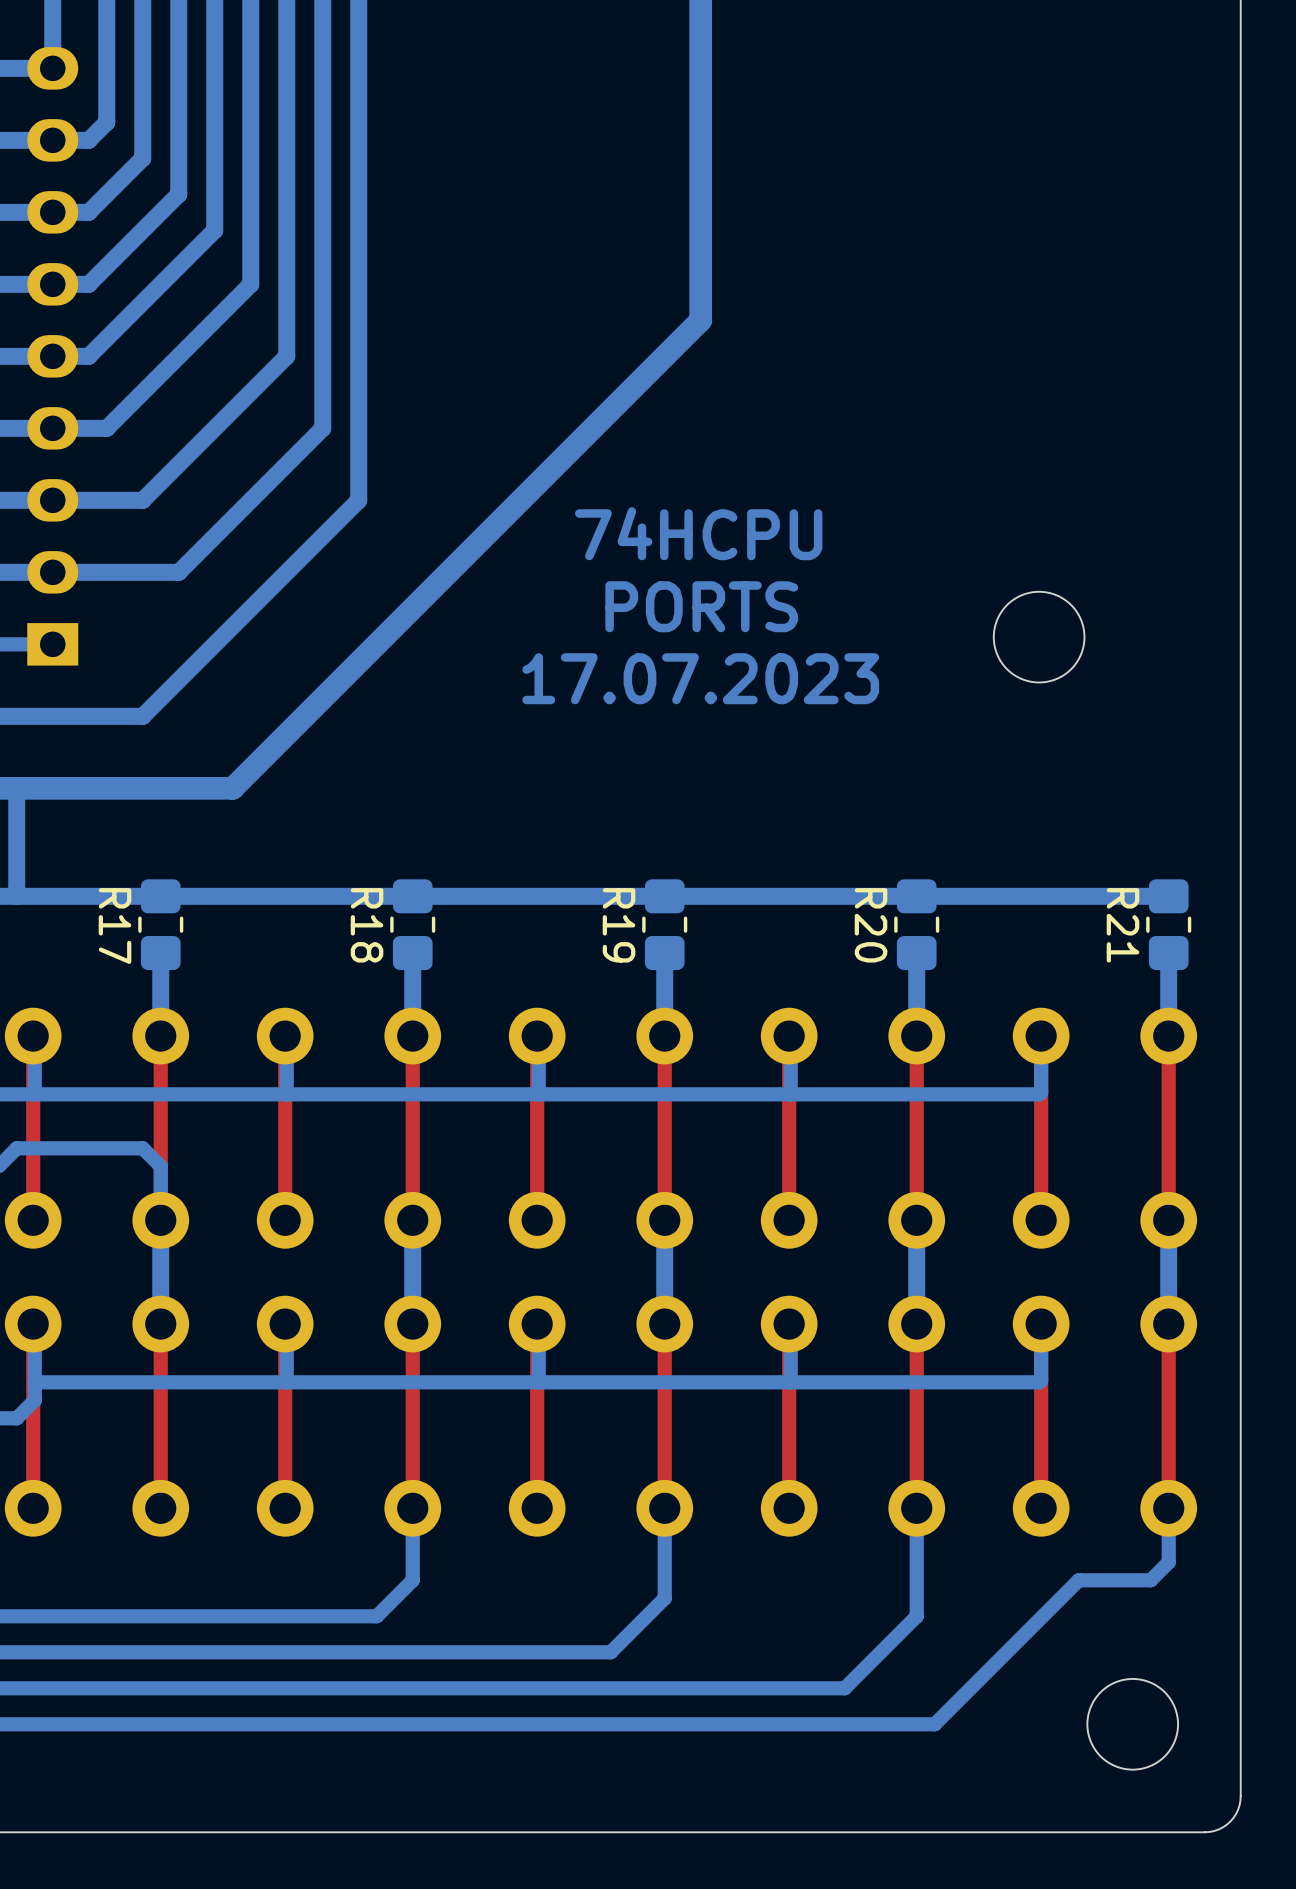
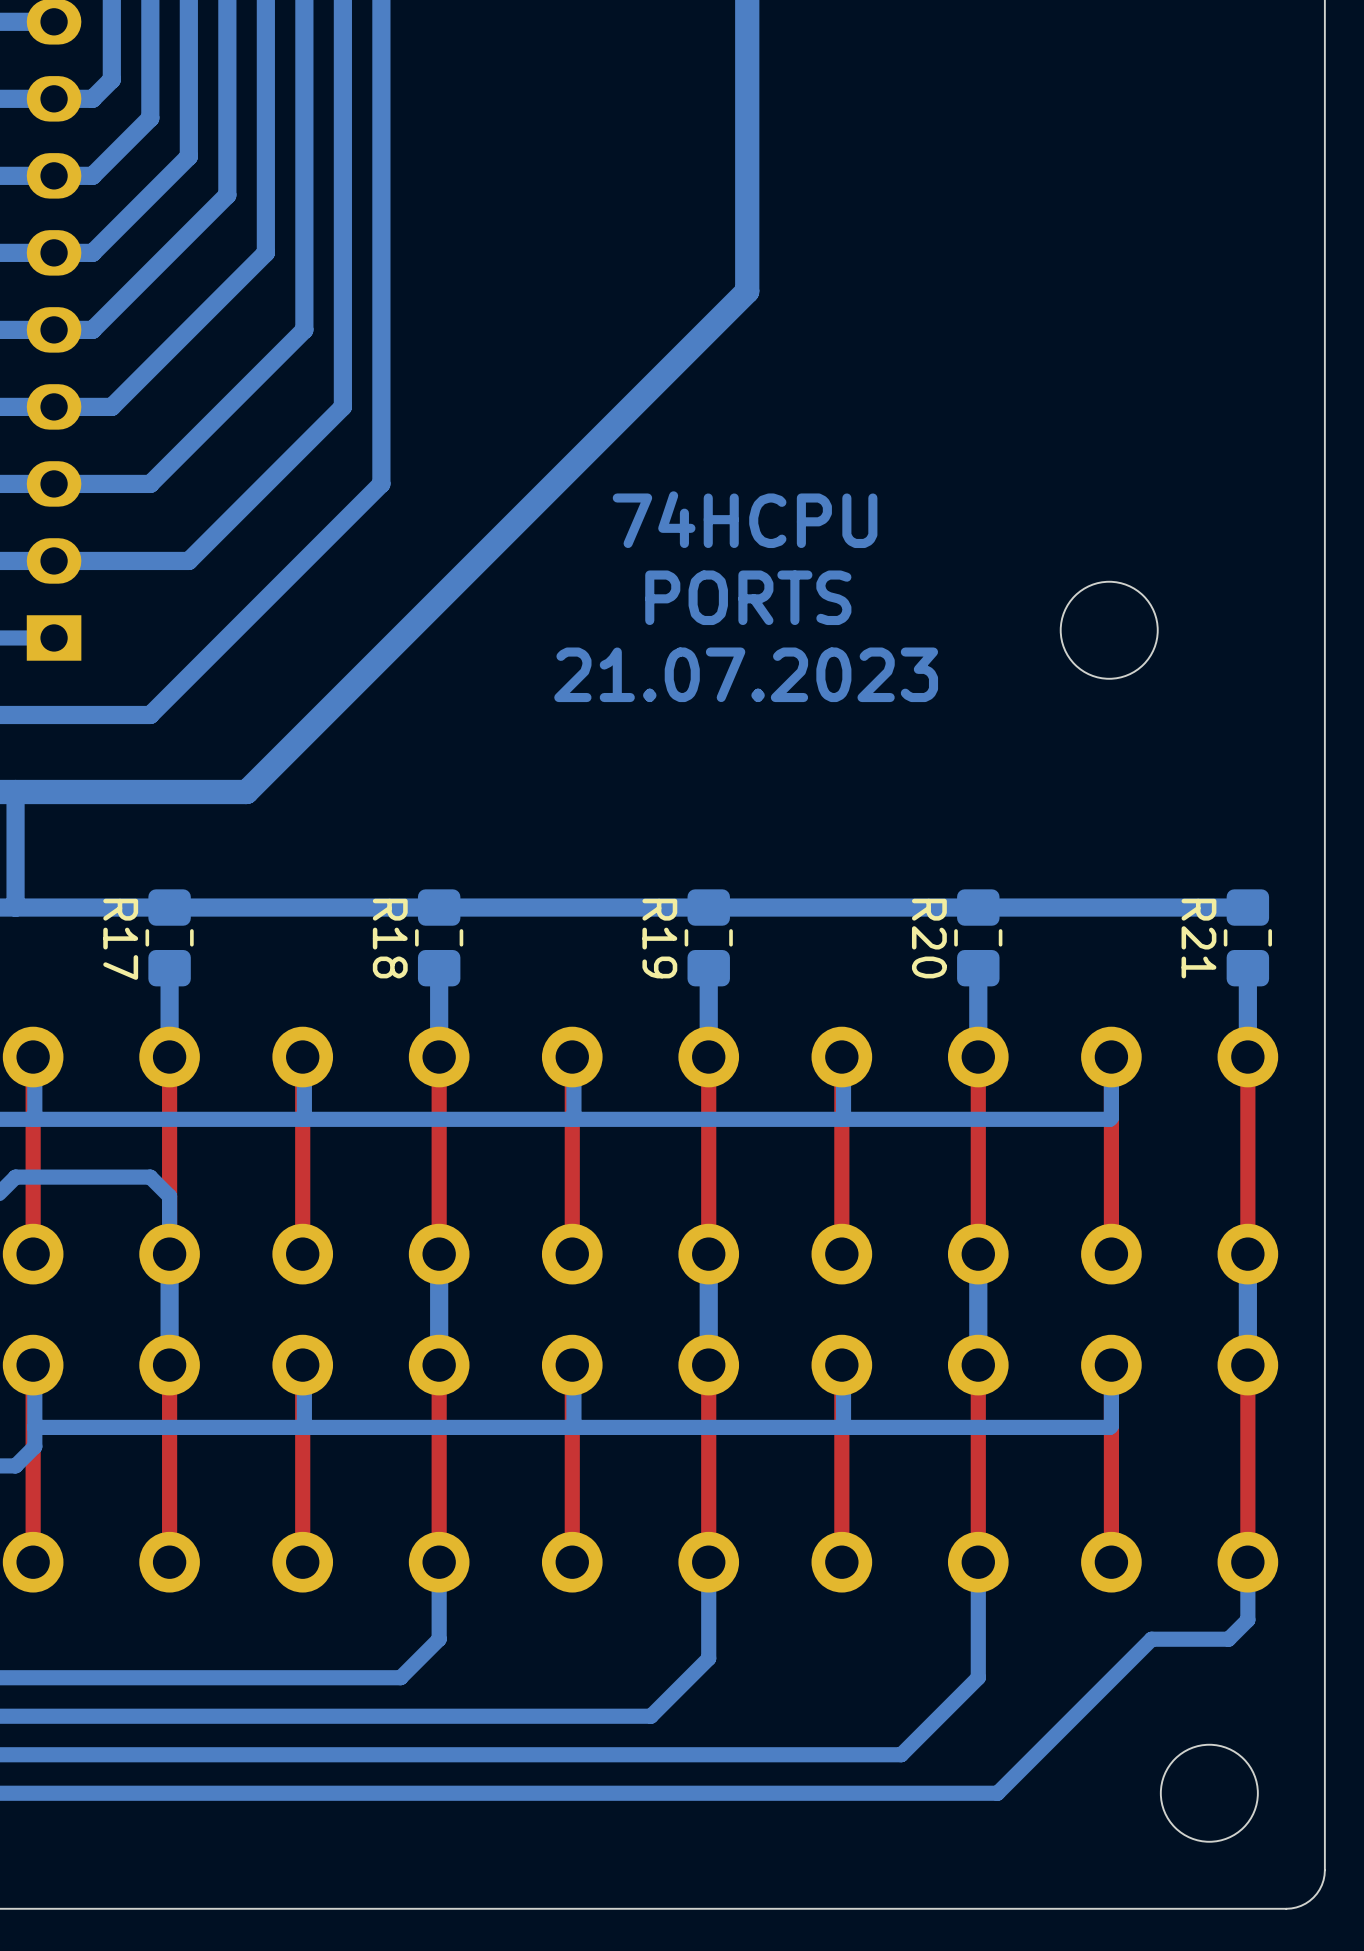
text: 17.07.2023 (700, 678) -> 21.07.2023 (746, 674)

